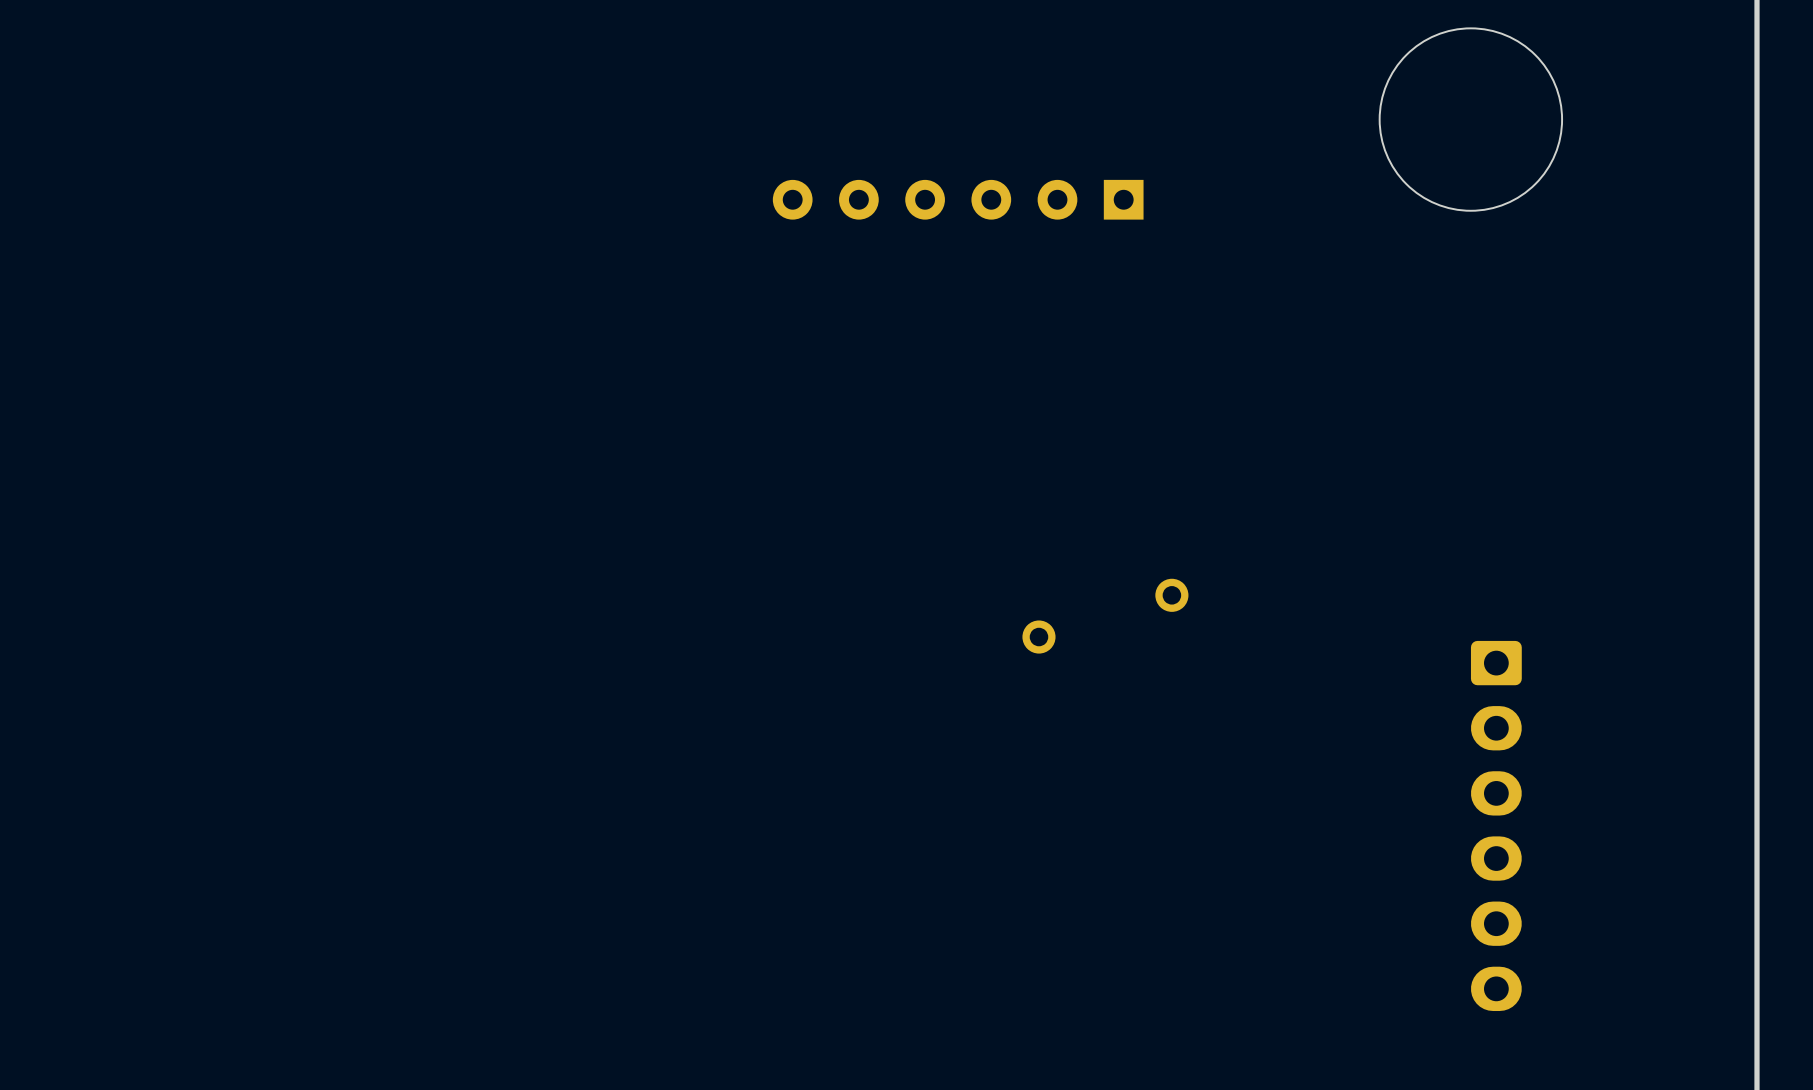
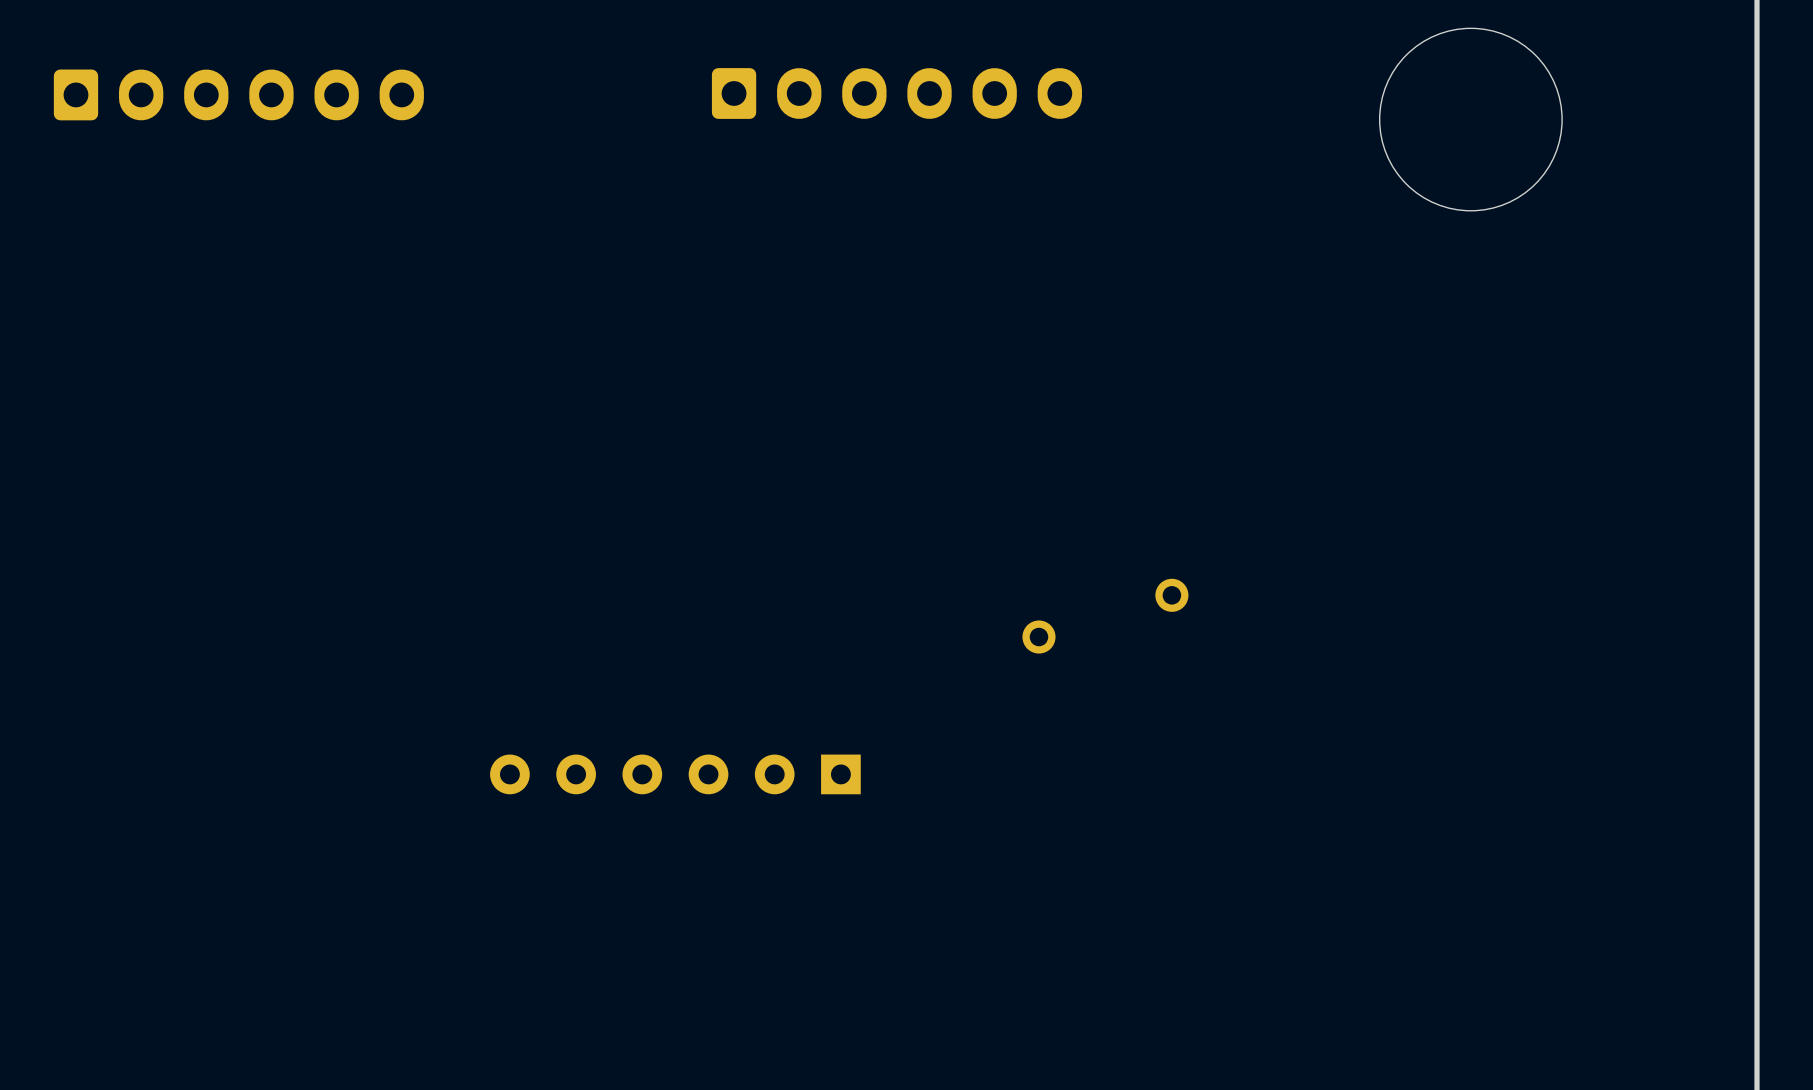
part: none -> (896, 93)
part: none -> (238, 94)
part position: (958, 199) -> (675, 774)
part: (1496, 825) -> none

